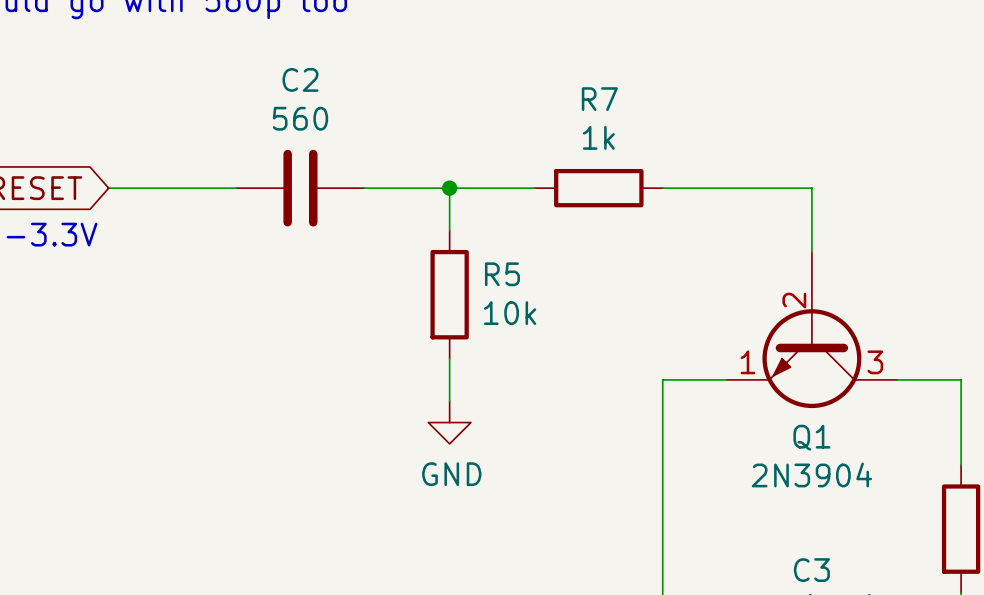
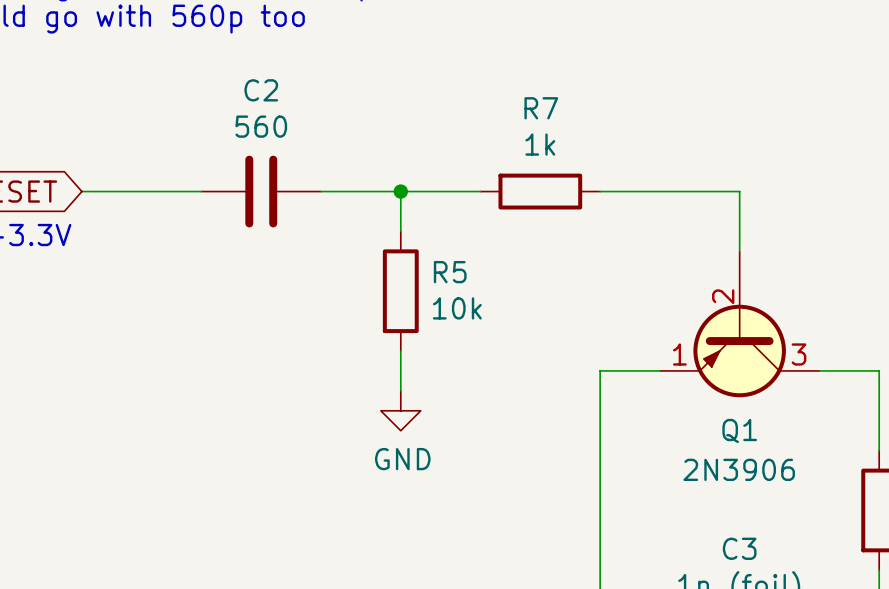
Q1 symbol: [726, 252, 898, 409] -> [659, 251, 820, 398]
Q1 value: 2N3904 (811, 474) -> 2N3906 (739, 469)

